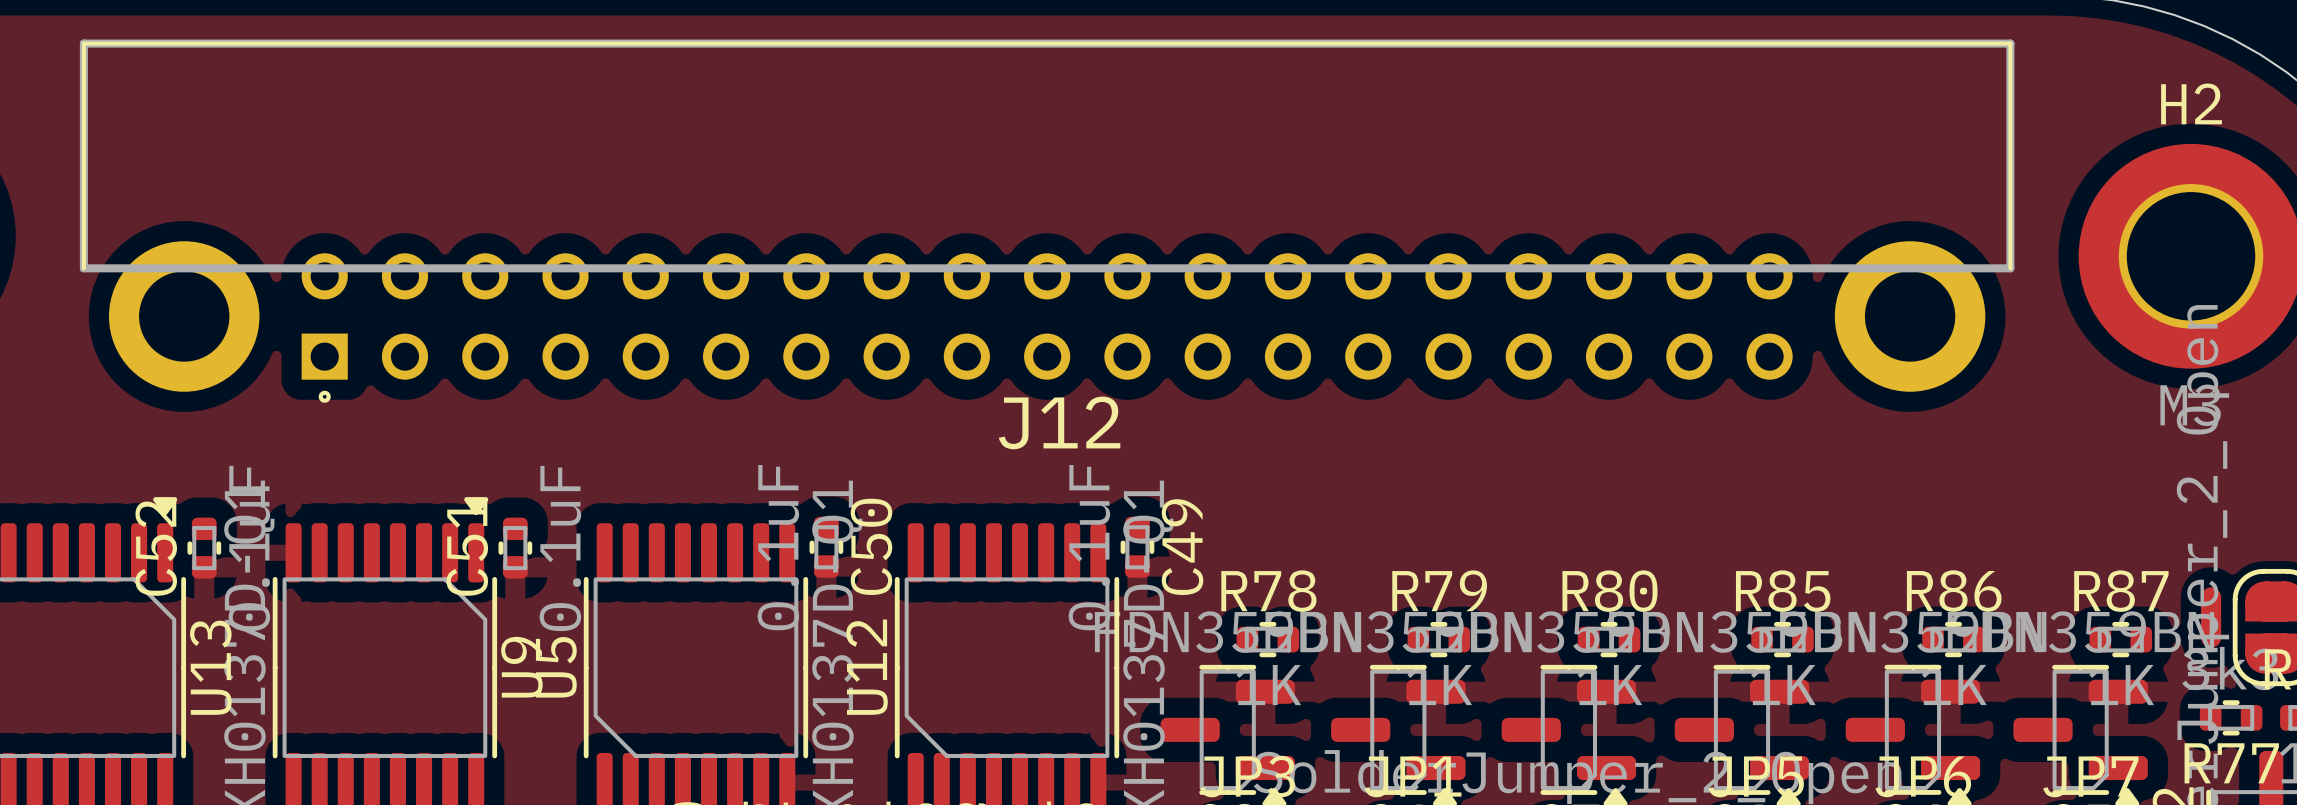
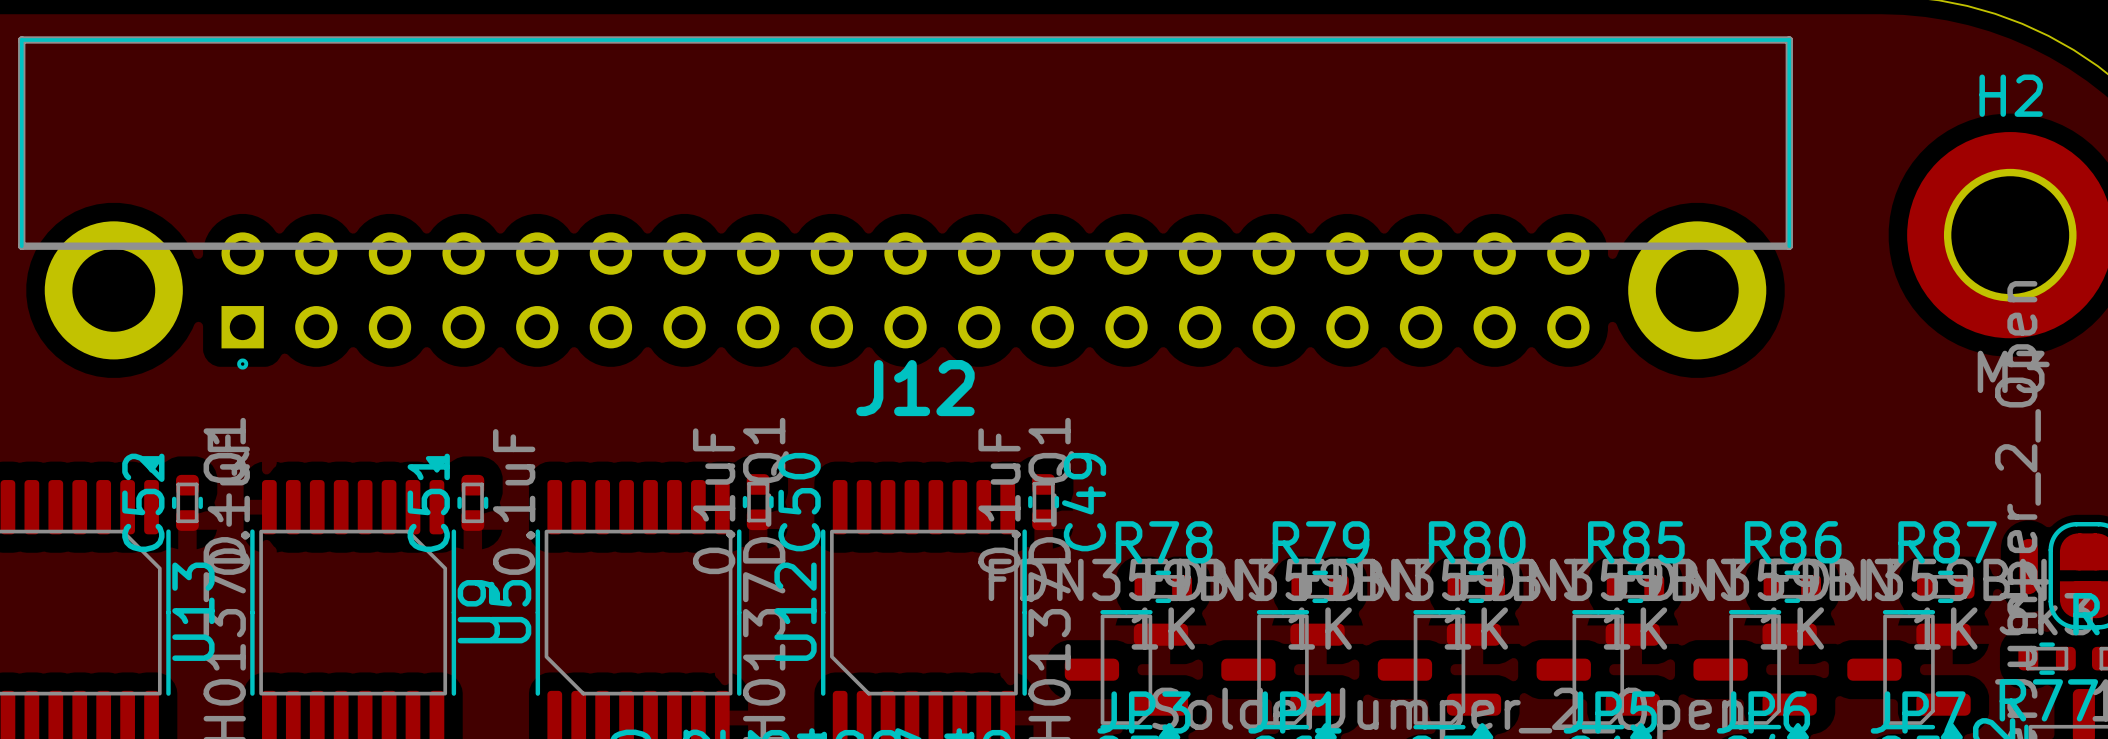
J12 position: (1047, 221) -> (905, 202)

